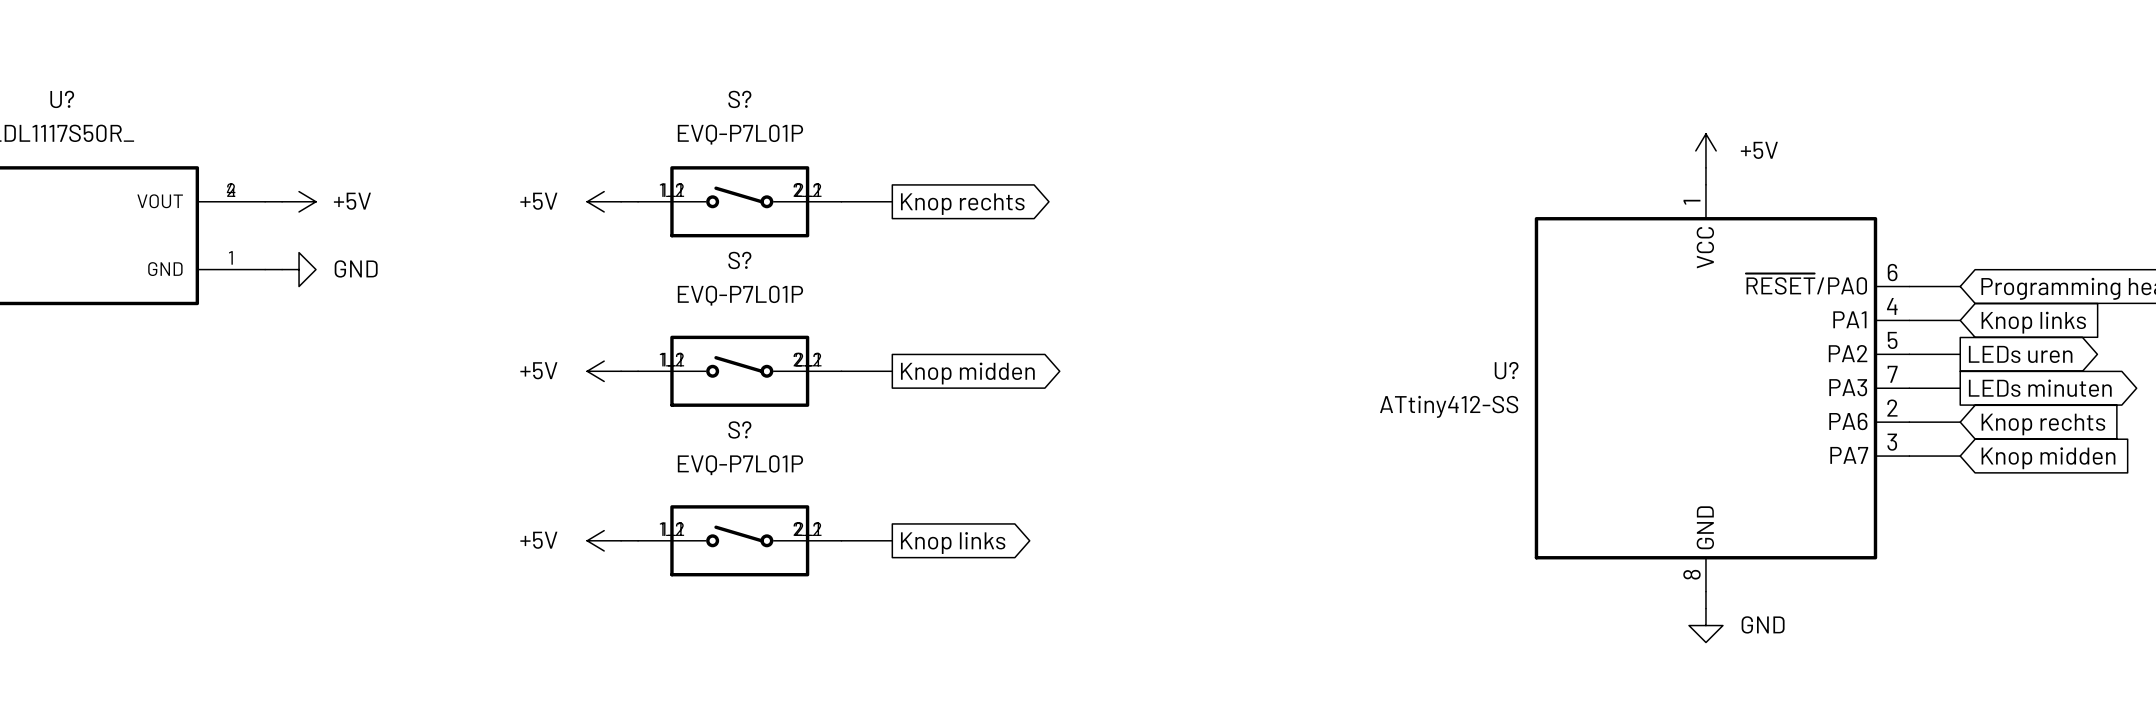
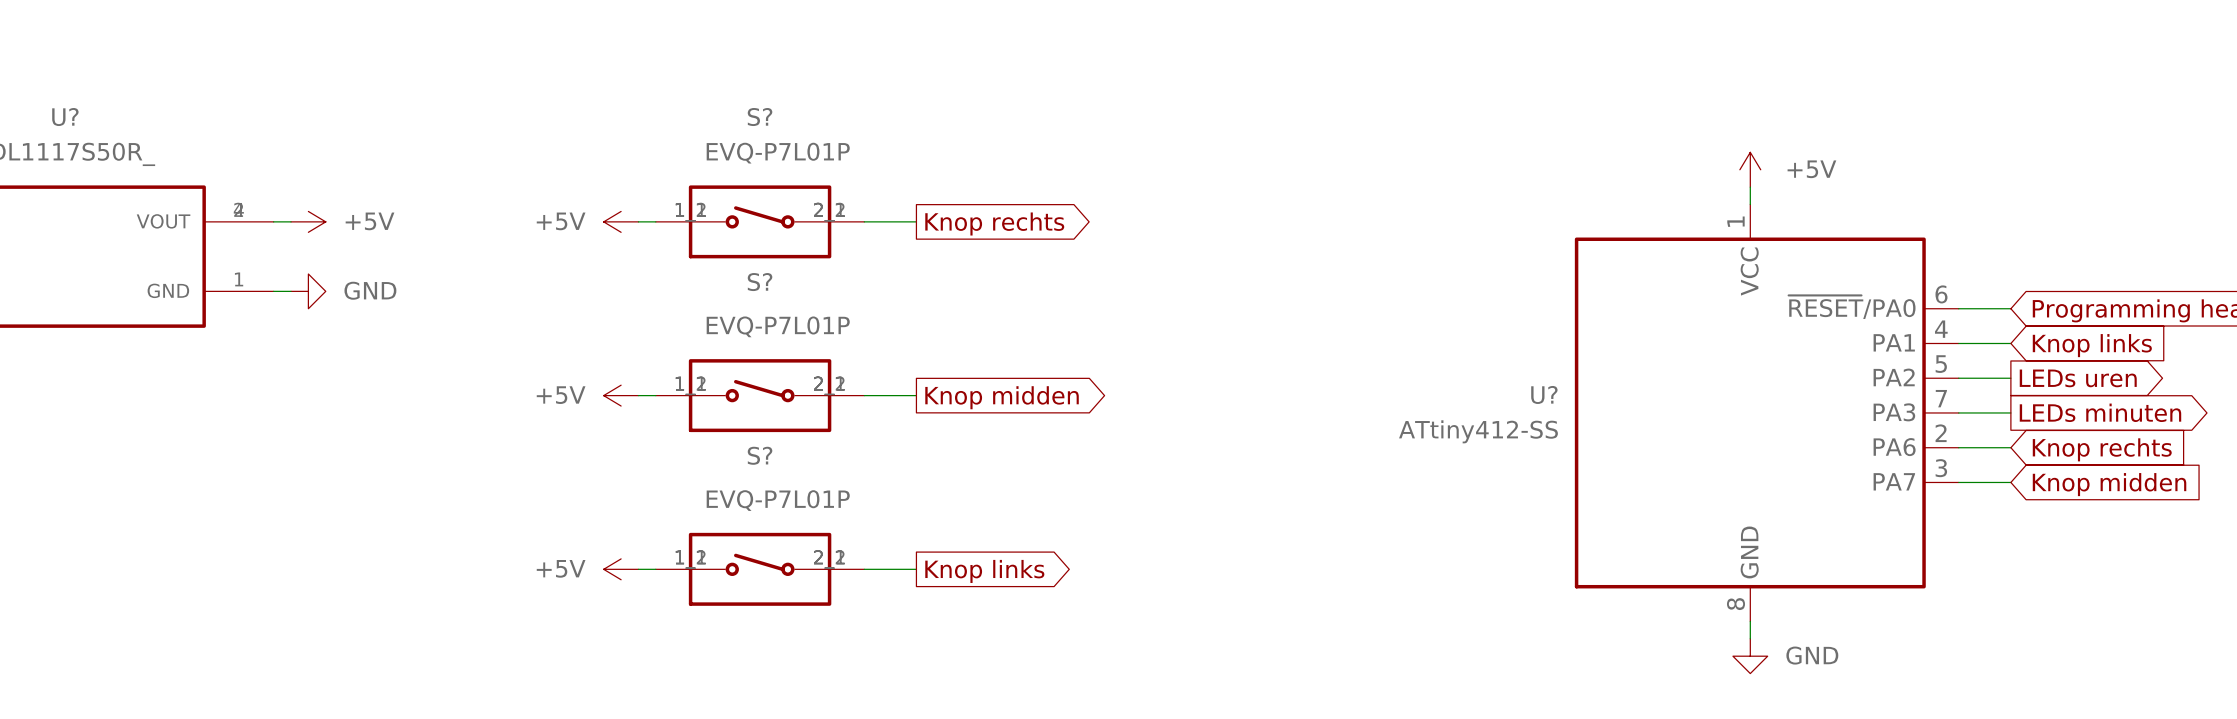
S? value position: EVQ-P7L01P (740, 134) -> EVQ-P7L01P (778, 153)
S? value position: EVQ-P7L01P (740, 295) -> EVQ-P7L01P (778, 326)
S? value position: EVQ-P7L01P (740, 465) -> EVQ-P7L01P (778, 500)

